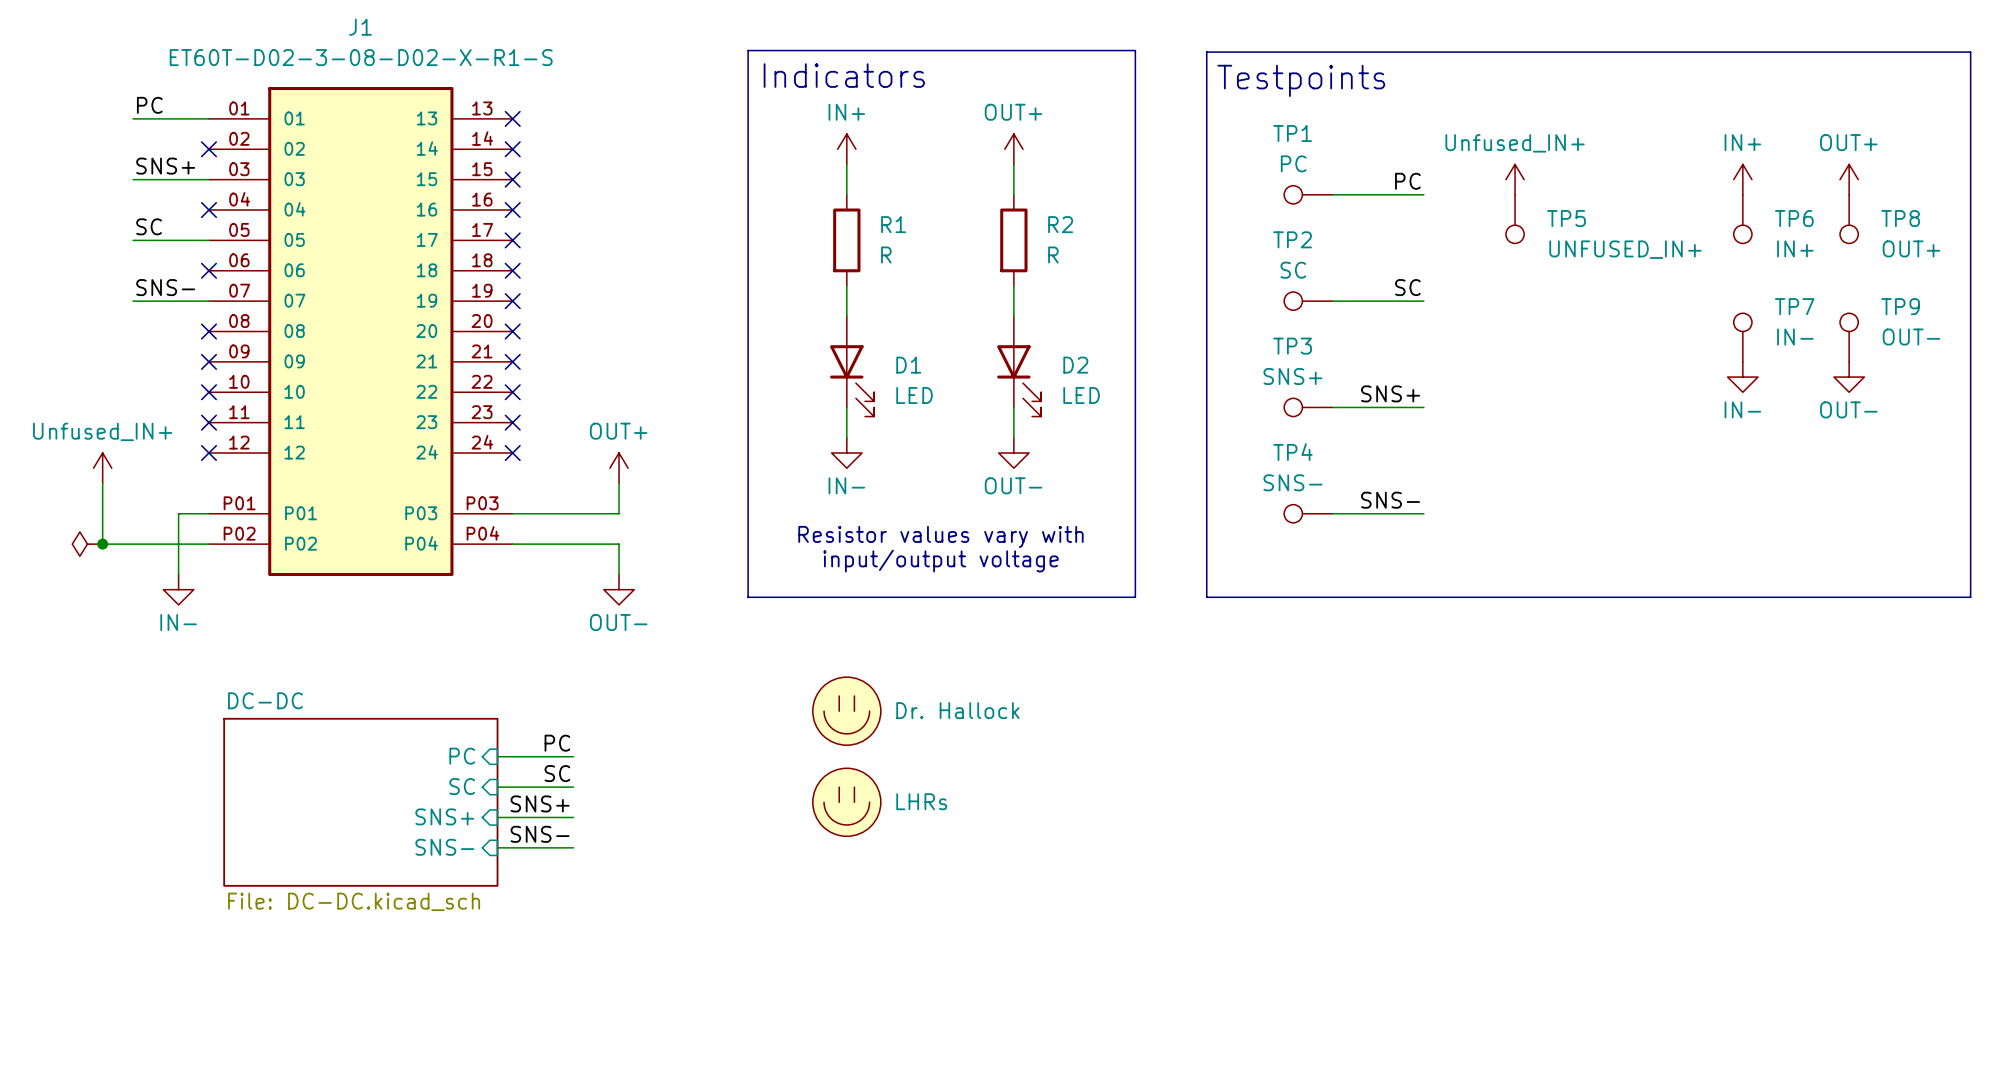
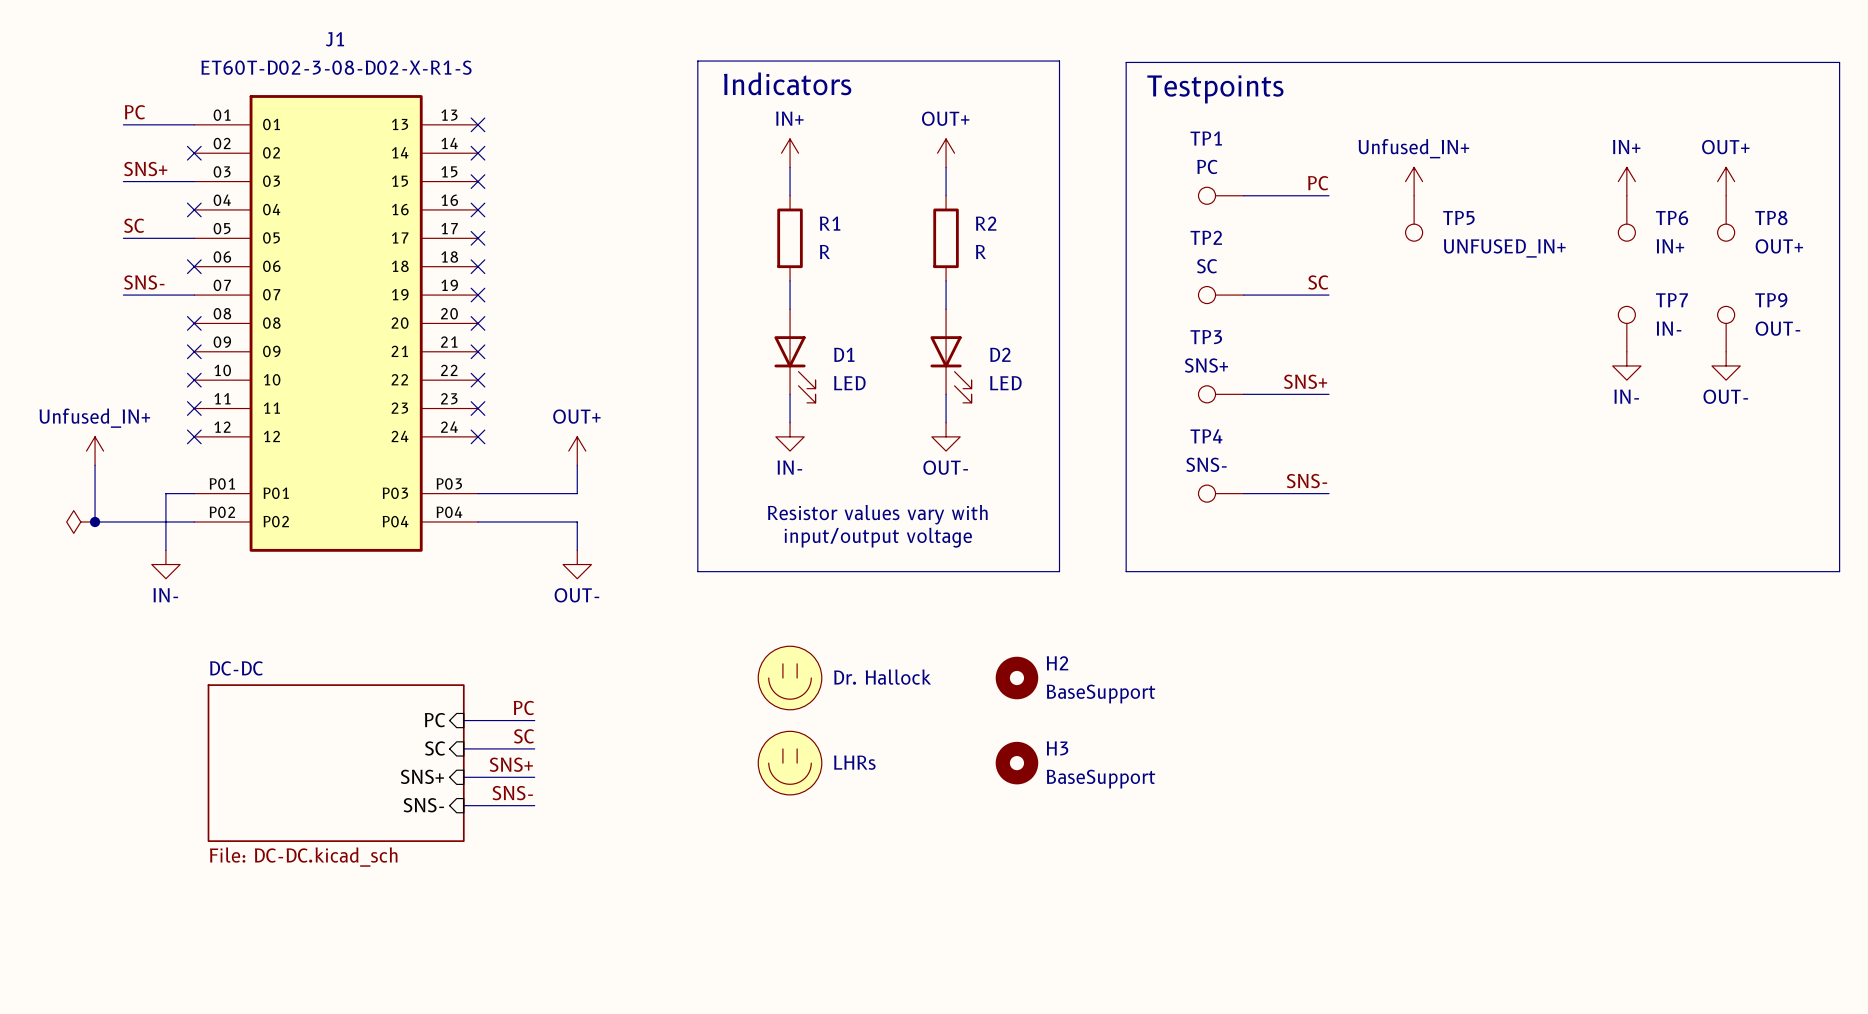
H2: none -> BaseSupport (1016, 678)
H3: none -> BaseSupport (1016, 763)

